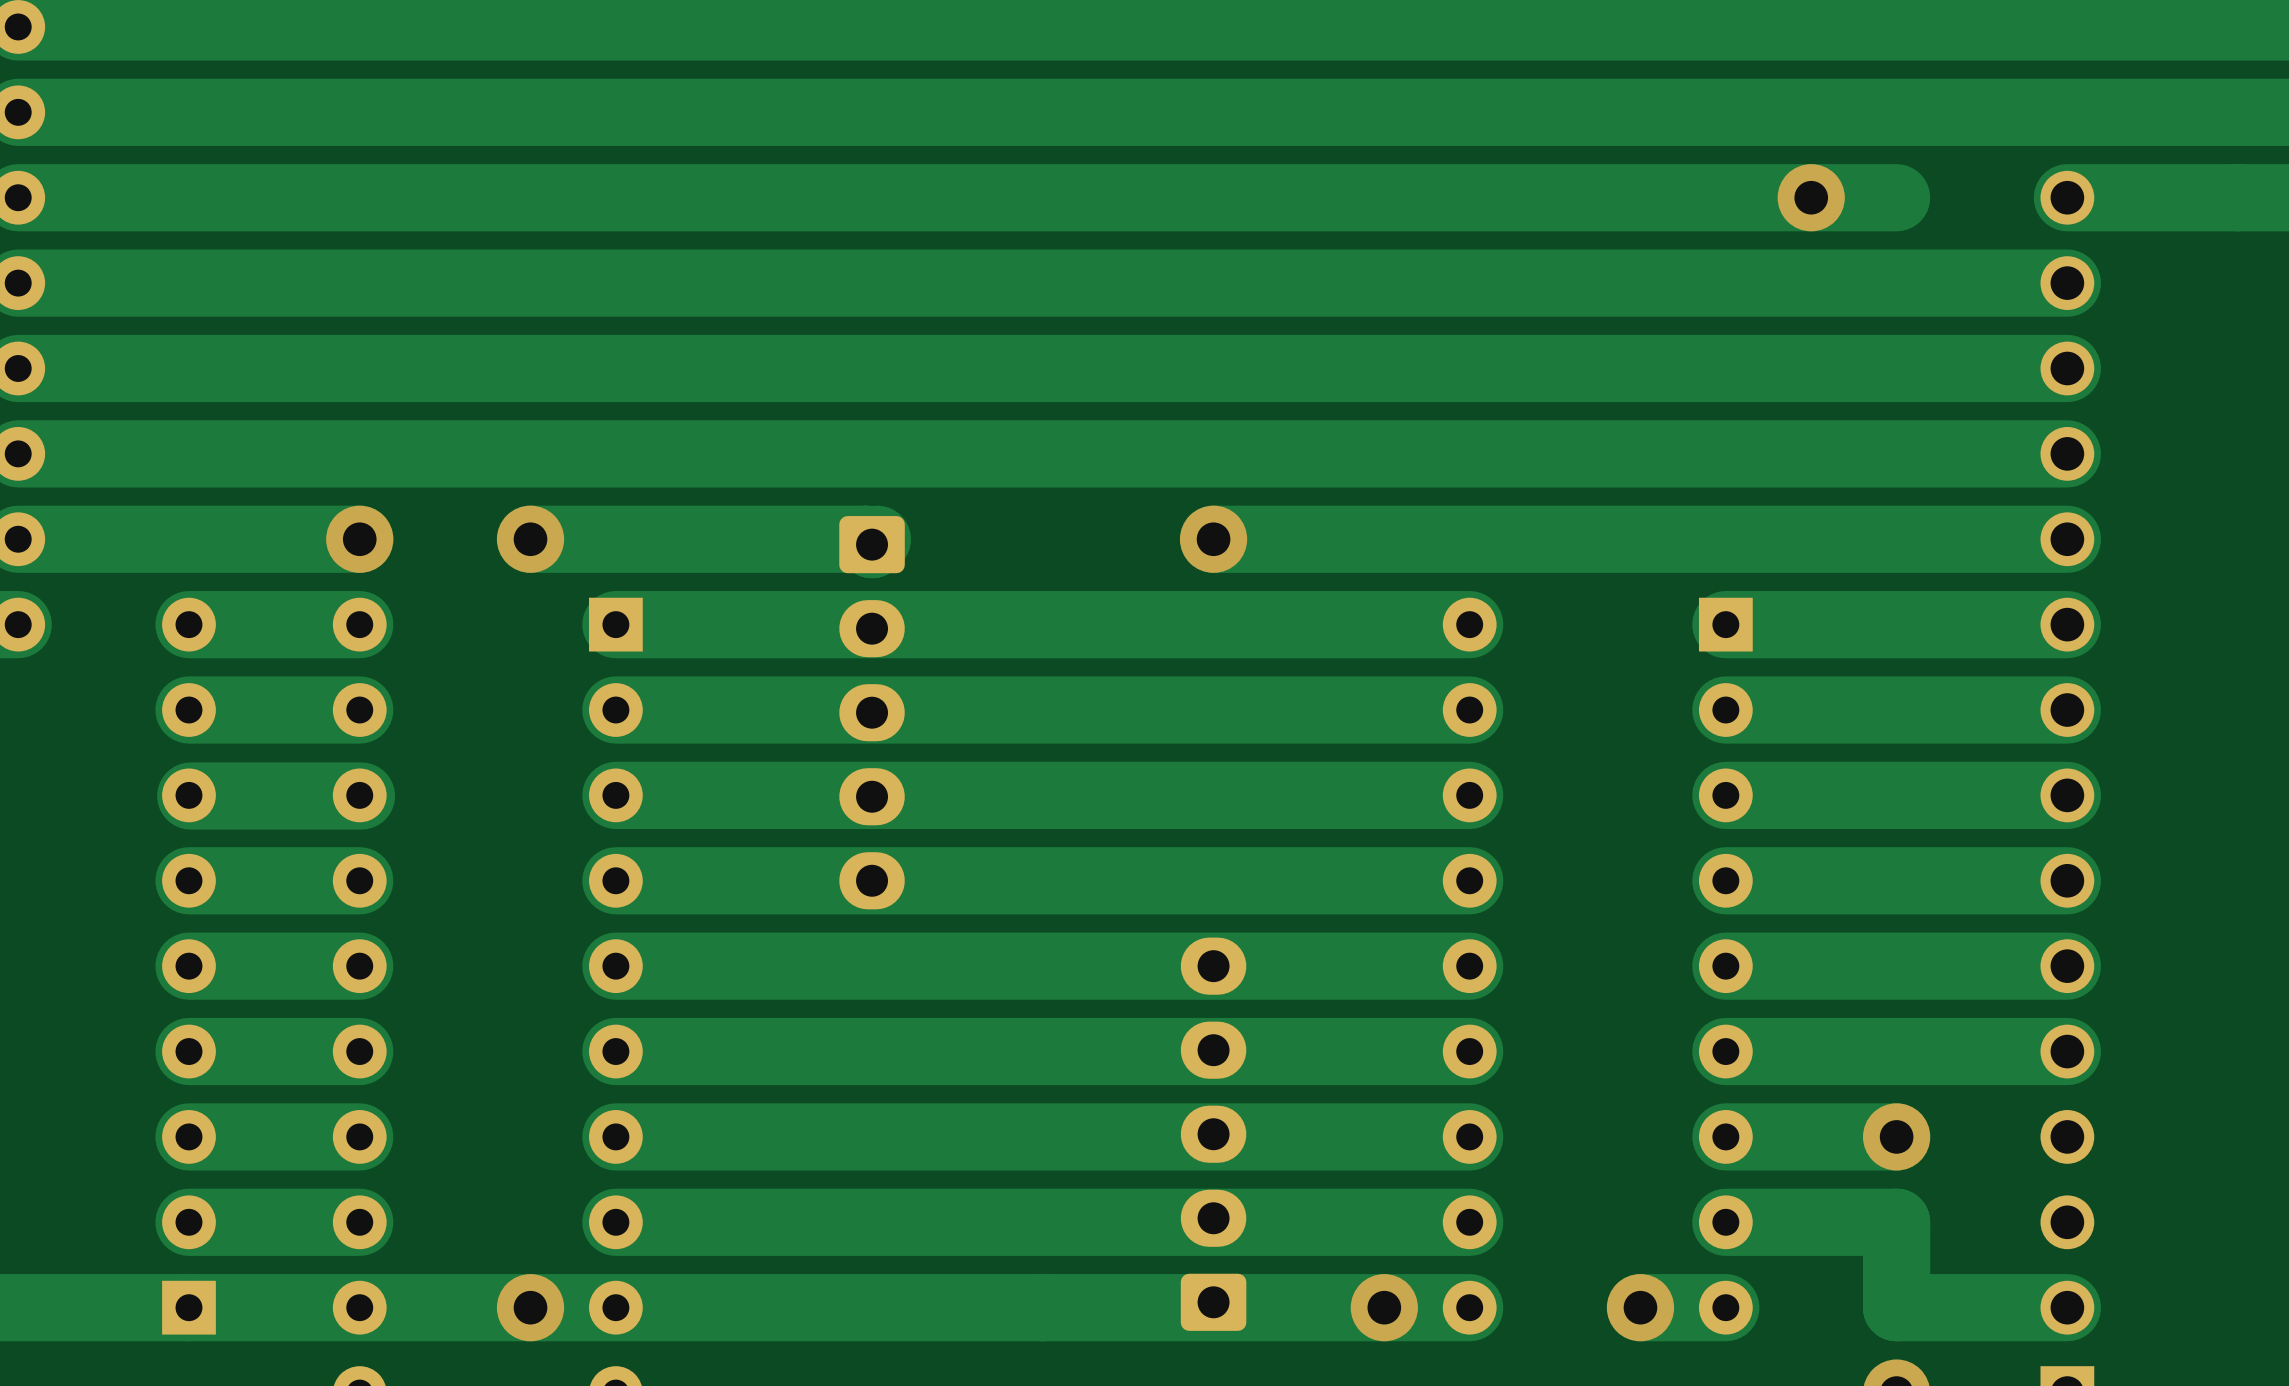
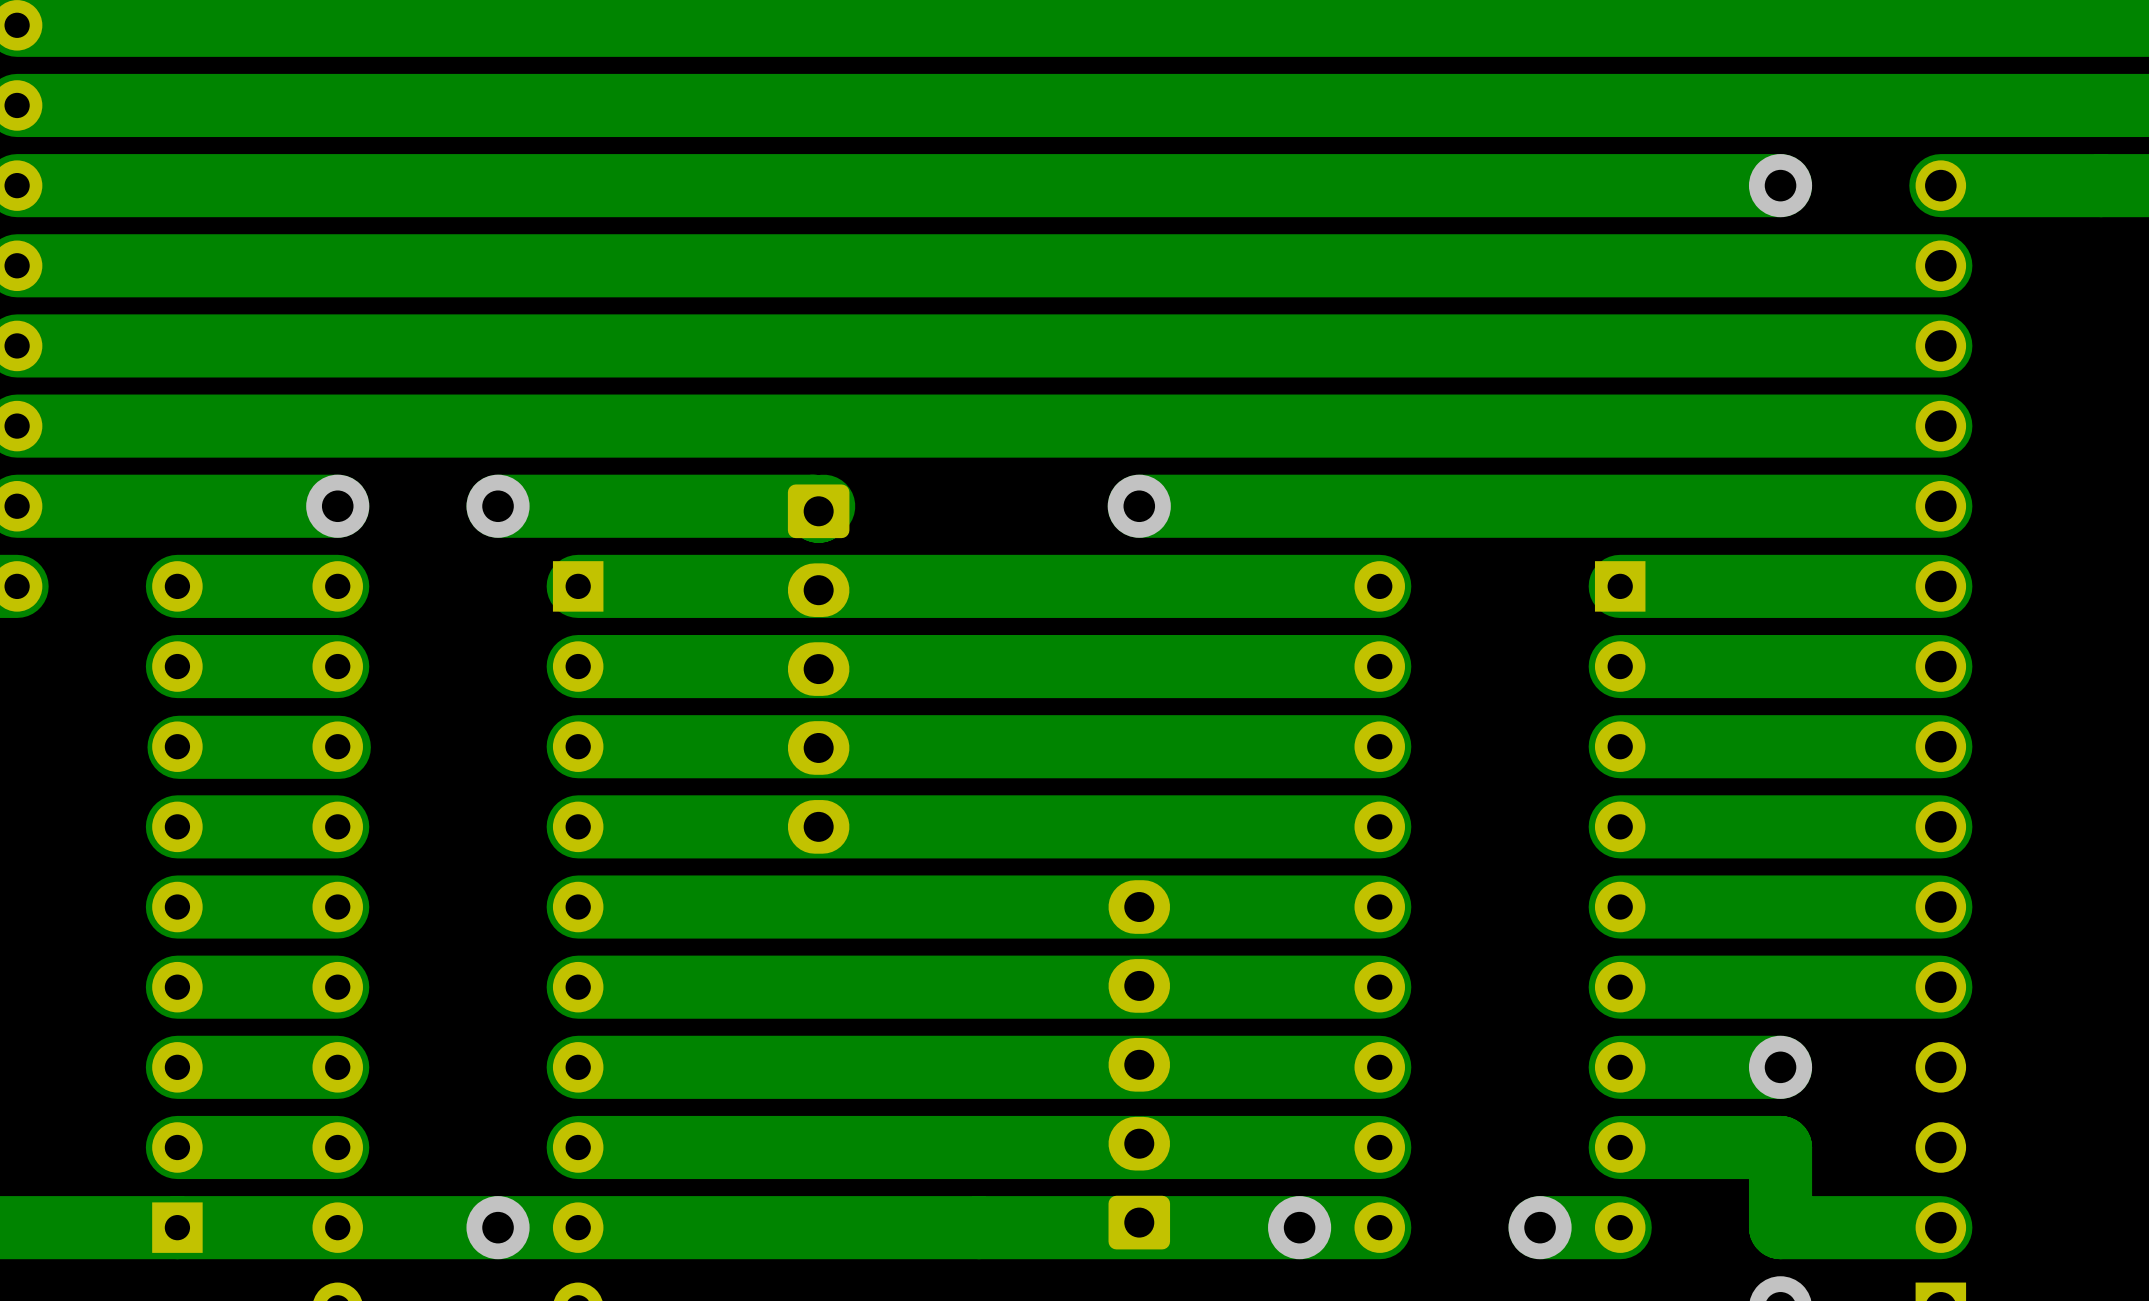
via position: (1811, 197) -> (1780, 185)

